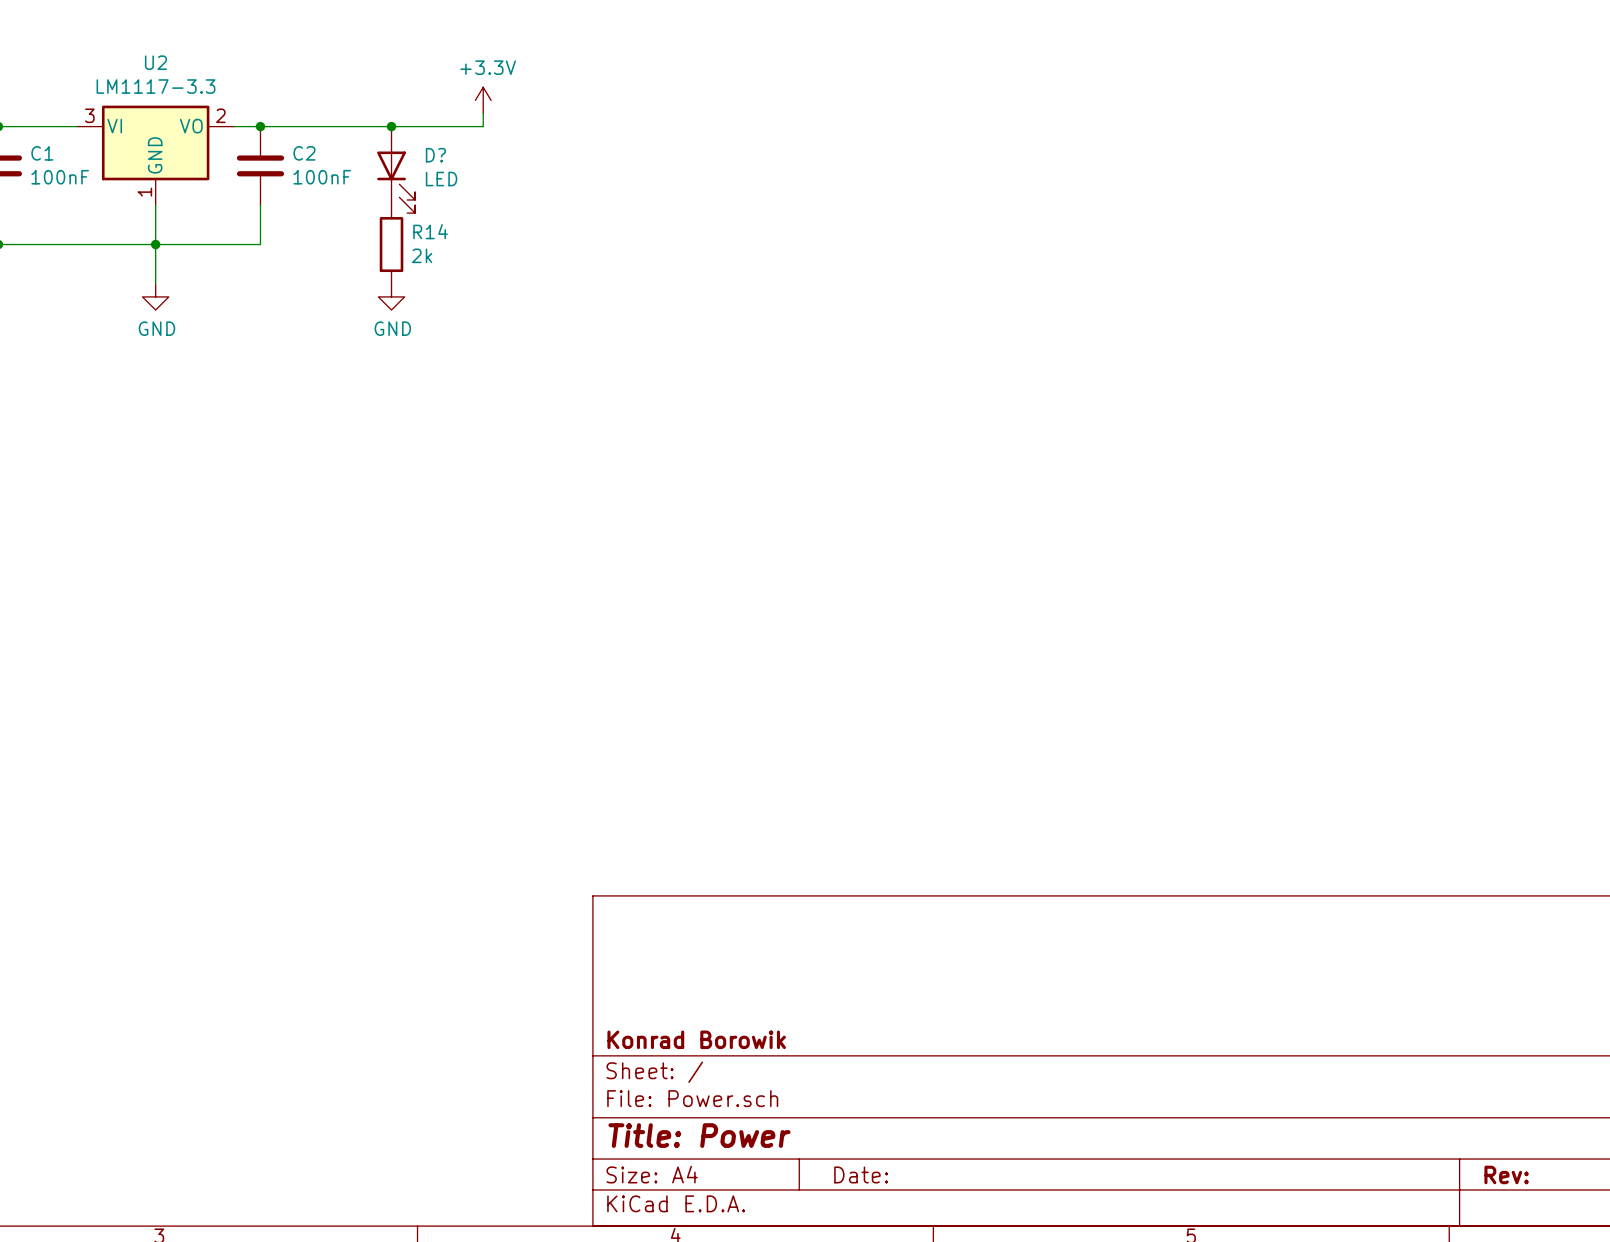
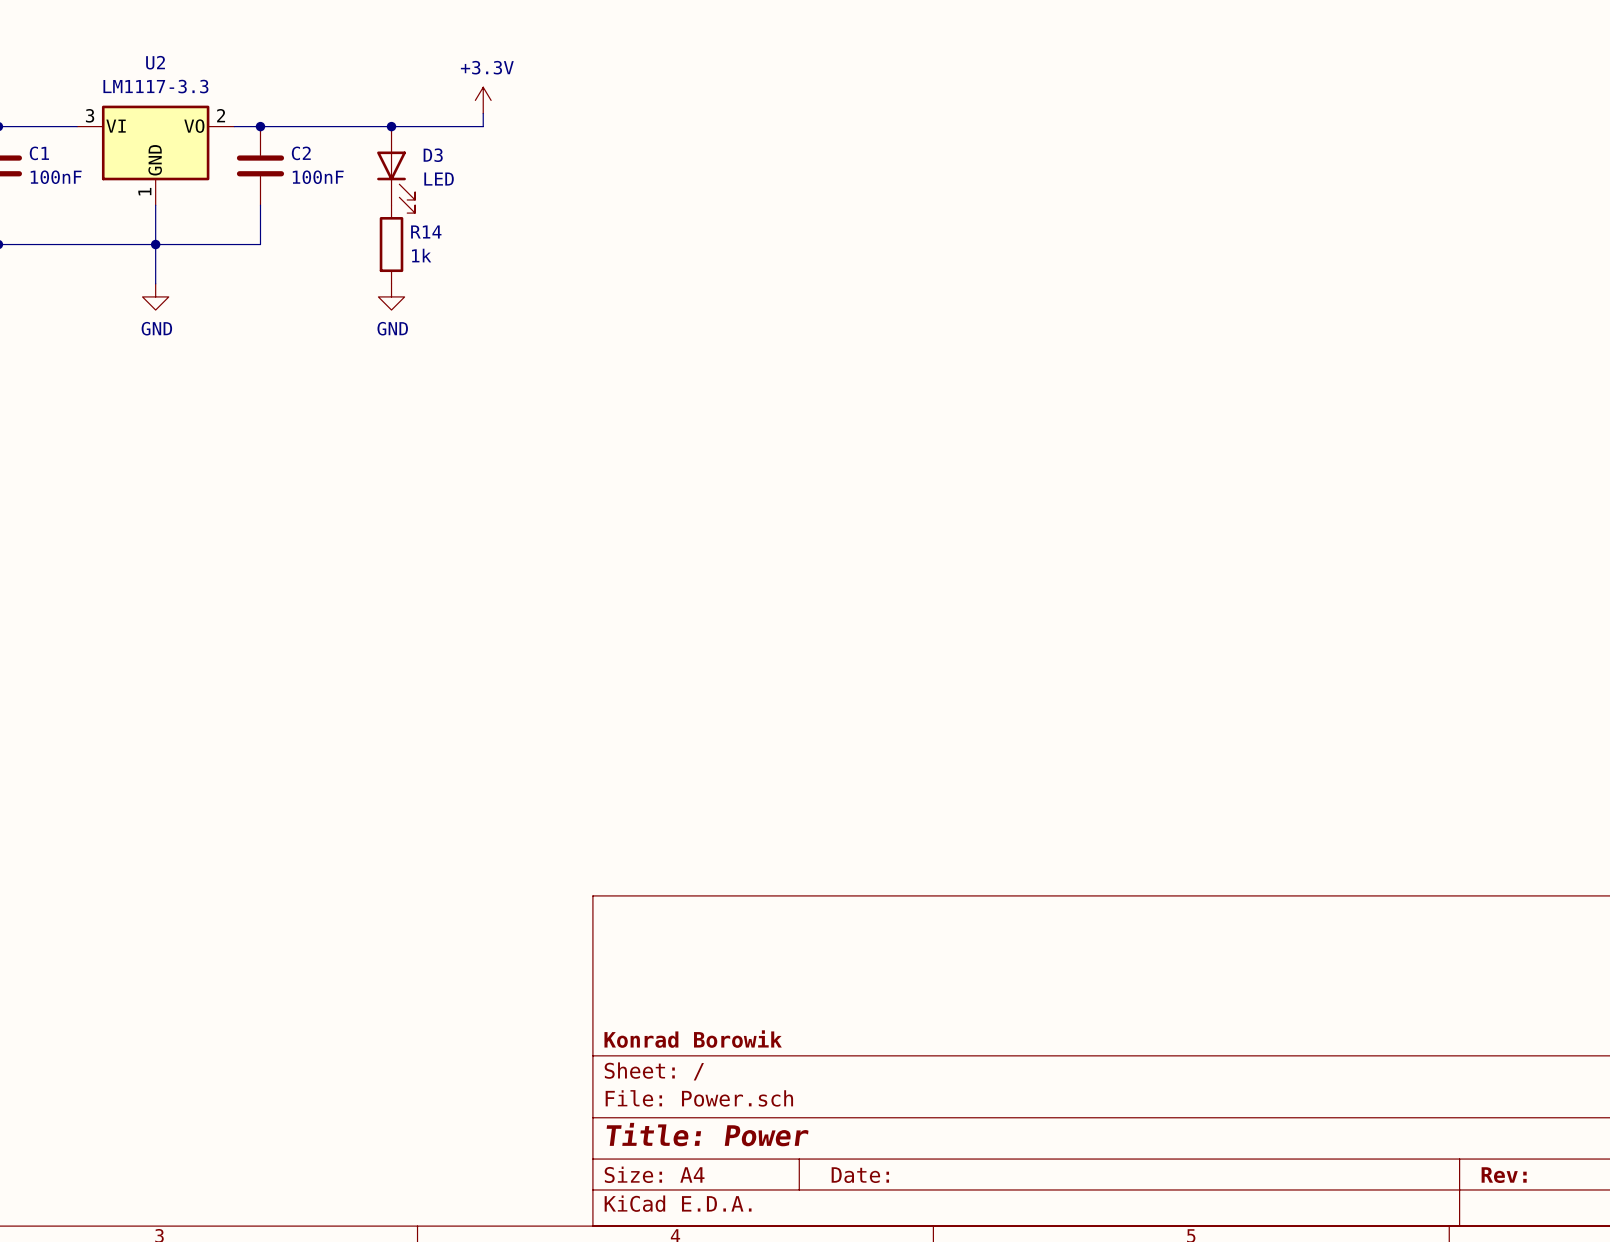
D? name: D? (435, 155) -> D3 (433, 155)
R14 value: 2k (422, 255) -> 1k (421, 255)

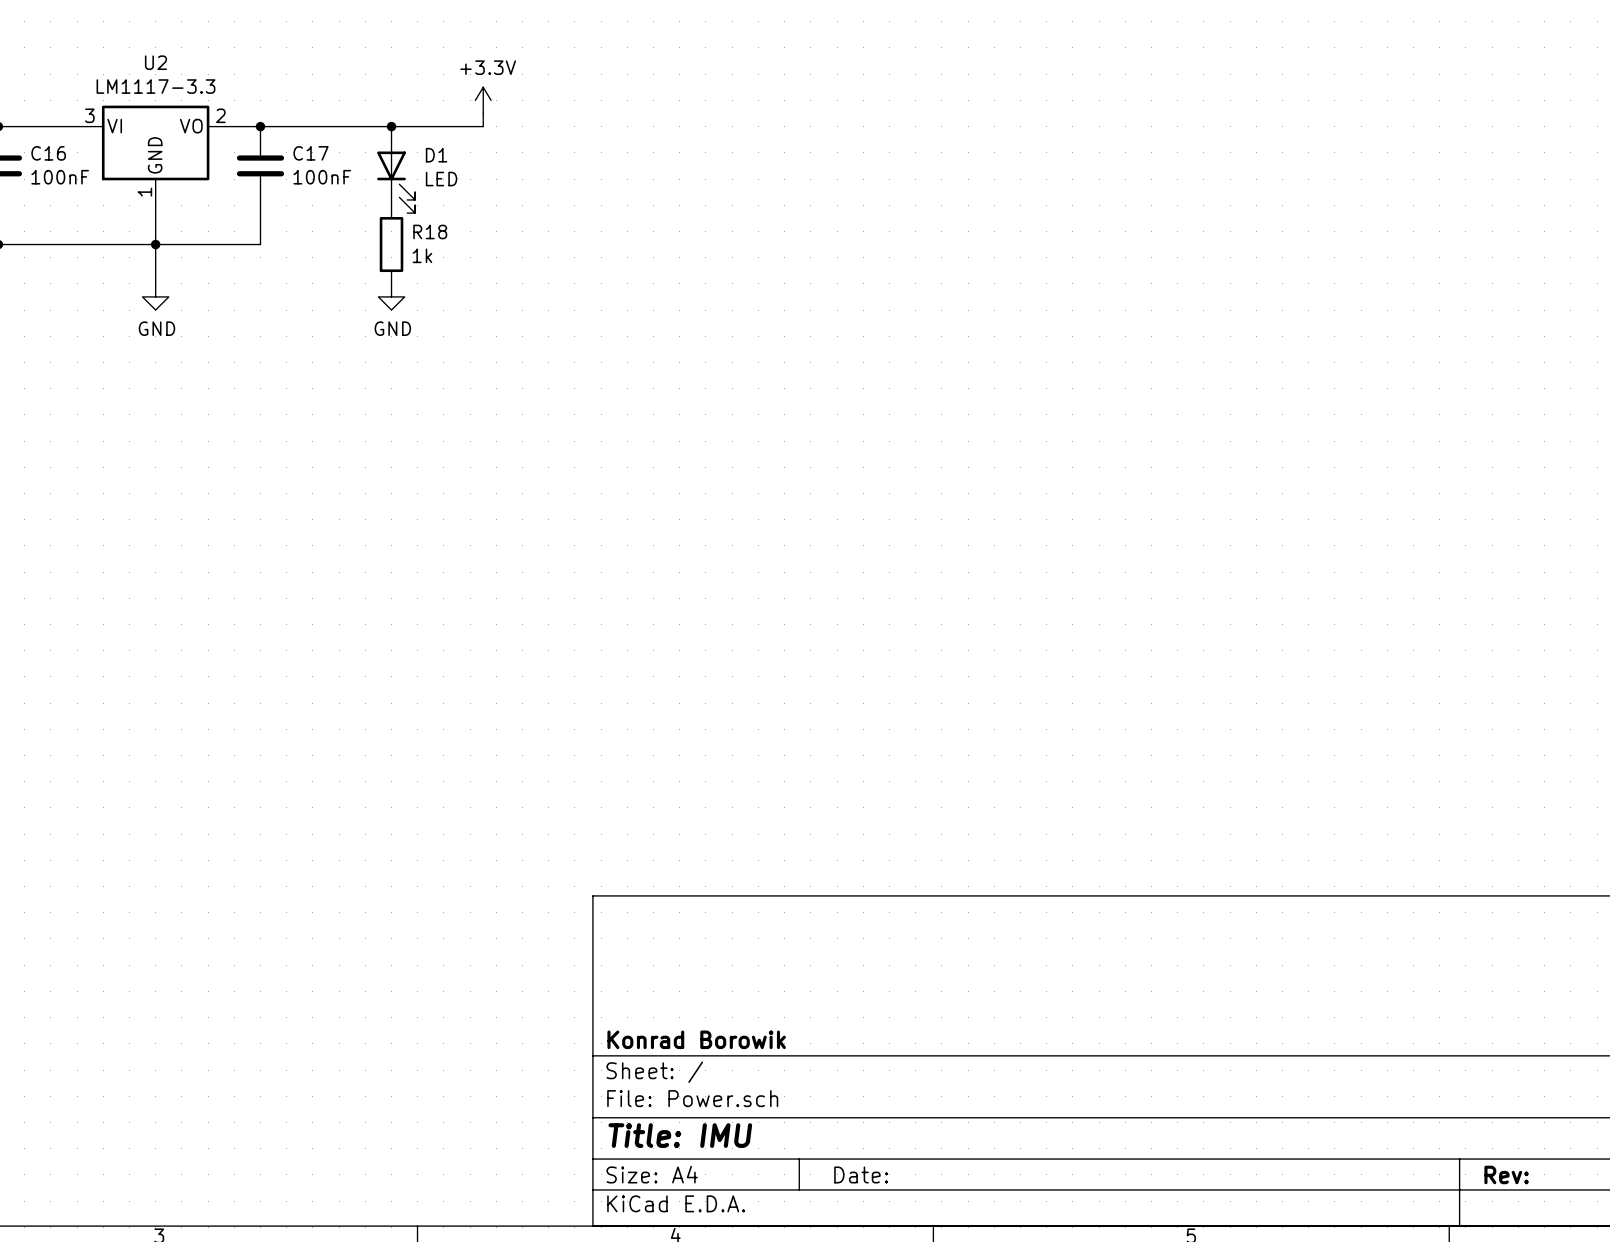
C1 name: C1 (39, 153) -> C16 (48, 153)
C2 name: C2 (301, 153) -> C17 (311, 153)
D3 name: D3 (433, 155) -> D1 (436, 155)
R14 name: R14 (426, 231) -> R18 (430, 231)
title block: Title: Power (707, 1134) -> Title: IMU (680, 1135)

